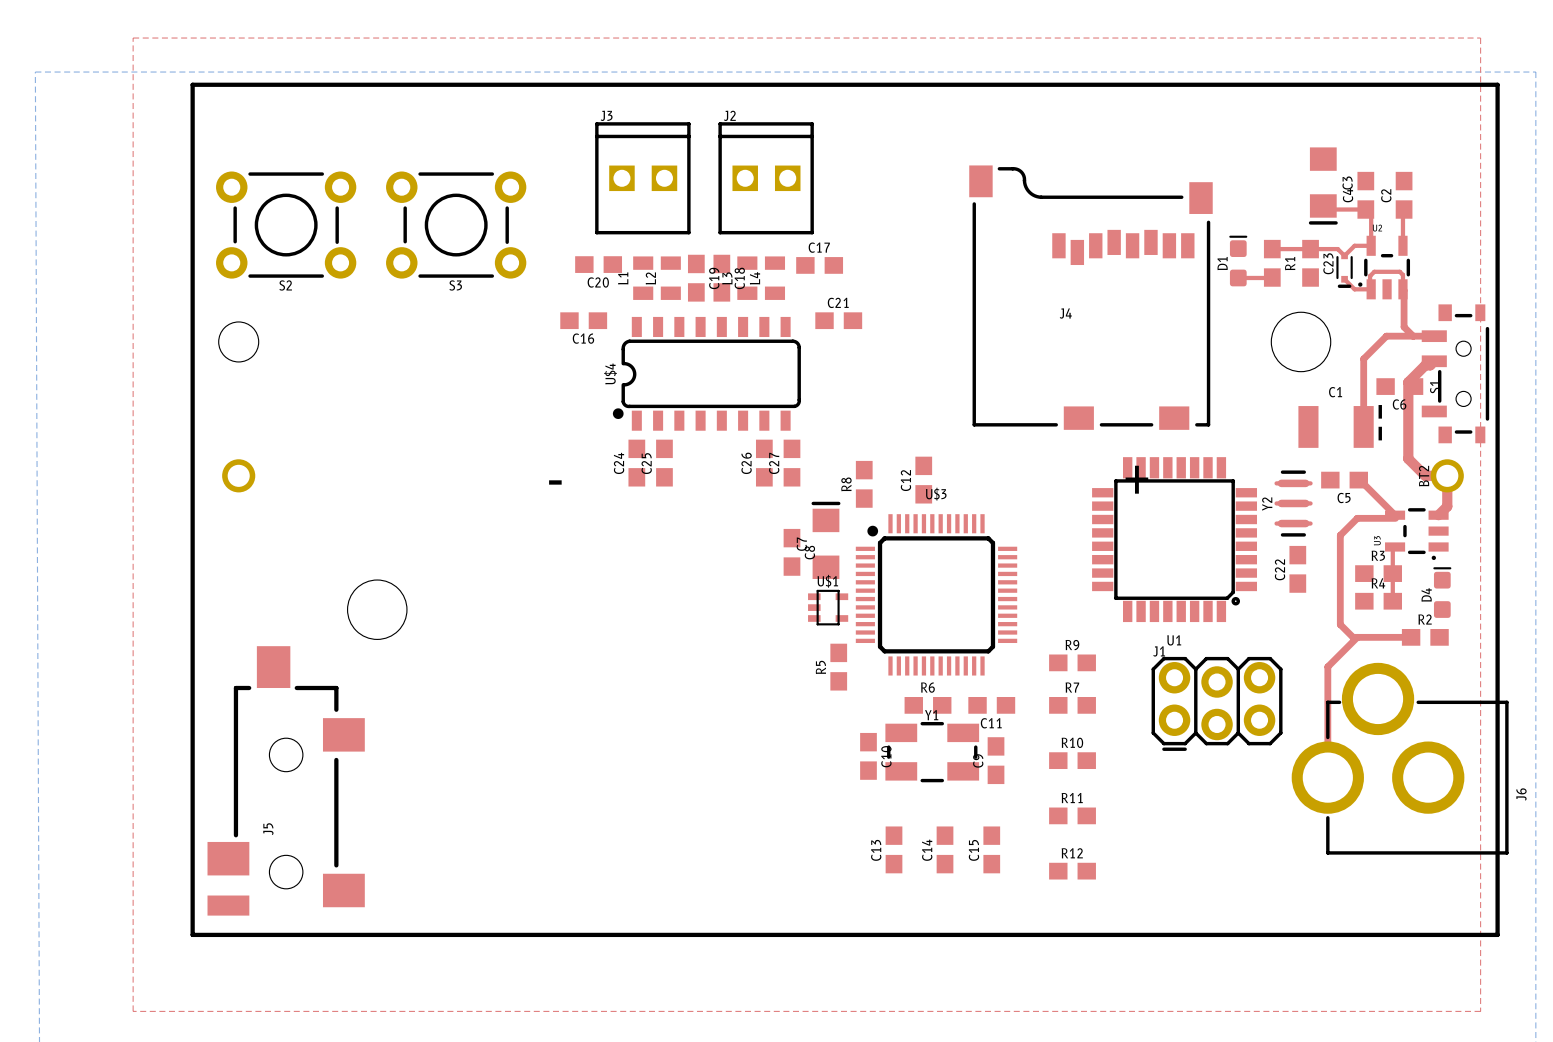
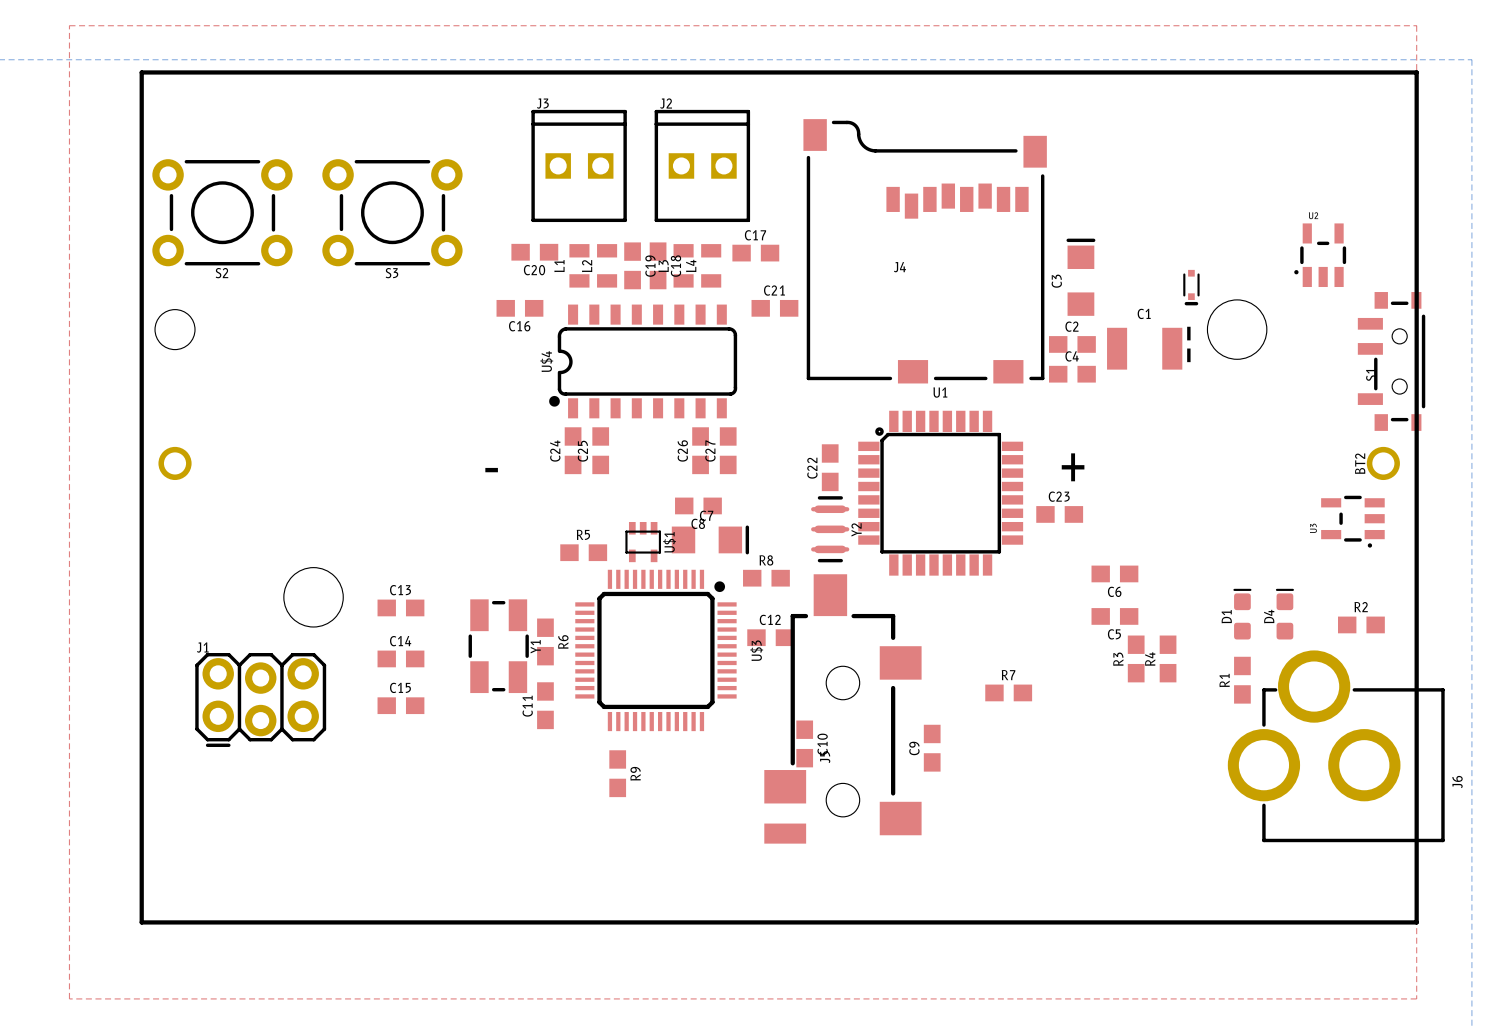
board edge: (205, 84) (192, 84) (192, 934) (205, 934) -> (141, 72) (141, 922)
board edge: (1480, 84) (1497, 84) (1497, 934) (1480, 934) -> (1416, 72) (1416, 922)
C3 rotation: 0° (1323, 186) -> 180° (1080, 277)
C3 position: (1323, 186) -> (1080, 277)
C4 rotation: 0° (1365, 195) -> 90° clockwise (1072, 374)
C4 position: (1365, 195) -> (1072, 374)
C2 rotation: 0° (1404, 195) -> 90° clockwise (1072, 344)
C2 position: (1404, 195) -> (1072, 344)
top track: (1323, 205) (1326, 209) (1365, 209) (1371, 214) (1371, 245) (1354, 245) (1344, 255) (1337, 249) (1272, 249) -> none
top track: (1404, 209) (1402, 245) -> none
D1 position: (1238, 261) -> (1242, 614)
R1 position: (1272, 263) -> (1242, 680)
R1 name position: R1 (1290, 263) -> R1 (1224, 680)
C23 rotation: 0° (1310, 263) -> 90° clockwise (1059, 514)
C23 position: (1310, 263) -> (1059, 514)
part position: (1344, 270) -> (1191, 287)
top track: (1272, 277) (1238, 277) -> none
top track: (1344, 279) (1354, 289) (1371, 289) (1370, 276) (1374, 271) (1399, 271) (1402, 274) (1404, 327) (1413, 336) -> none
J4 position: (1090, 297) -> (925, 251)
top track: (1434, 336) (1386, 336) (1363, 358) (1363, 426) -> none
top track: (1434, 361) (1430, 365) (1425, 365) (1408, 382) (1408, 458) (1425, 475) (1447, 475) (1447, 506) (1438, 515) -> none
C6 position: (1399, 386) -> (1114, 573)
C1 position: (1340, 426) -> (1148, 348)
C12 rotation: 0° (923, 480) -> 90° clockwise (770, 637)
C12 position: (923, 480) -> (770, 637)
C5 position: (1344, 480) -> (1114, 616)
top track: (1363, 483) (1395, 515) (1395, 518) (1357, 518) (1340, 535) (1340, 624) (1353, 637) (1411, 637) -> none
R8 rotation: 0° (864, 484) -> 90° clockwise (766, 578)
R8 position: (864, 484) -> (766, 578)
Y2 position: (1293, 503) -> (830, 529)
Y2 name position: Y2 (1267, 504) -> Y2 (856, 529)
U1 rotation: 0° (1174, 539) -> 180° (940, 493)
U1 position: (1174, 539) -> (940, 493)
C7 rotation: 0° (825, 540) -> 90° clockwise (710, 539)
C7 position: (825, 540) -> (710, 539)
top track: (1395, 546) (1392, 549) (1392, 601) -> none
C8 rotation: 0° (791, 552) -> 90° clockwise (698, 505)
C8 position: (791, 552) -> (698, 505)
C22 position: (1297, 569) -> (830, 467)
R3 rotation: 0° (1378, 573) -> 90° clockwise (1136, 658)
R3 position: (1378, 573) -> (1136, 658)
D4 position: (1442, 592) -> (1284, 614)
U$3 rotation: 0° (936, 594) -> 90° clockwise (655, 650)
U$3 position: (936, 594) -> (655, 650)
R4 rotation: 0° (1378, 601) -> 90° clockwise (1168, 658)
R4 position: (1378, 601) -> (1168, 658)
U$1 rotation: 0° (828, 607) -> 90° clockwise (643, 542)
U$1 position: (828, 607) -> (643, 542)
top track: (1357, 637) (1327, 666) (1327, 777) -> none
R9 rotation: 0° (1072, 662) -> 90° clockwise (617, 773)
R9 position: (1072, 662) -> (617, 773)
R5 rotation: 0° (838, 667) -> 90° clockwise (583, 552)
R5 position: (838, 667) -> (583, 552)
J1 position: (1217, 703) -> (260, 699)
R6 rotation: 0° (928, 705) -> 90° clockwise (545, 641)
R6 position: (928, 705) -> (545, 641)
C11 rotation: 0° (991, 705) -> 90° clockwise (545, 705)
C11 position: (991, 705) -> (545, 705)
Y1 rotation: 0° (932, 752) -> 90° clockwise (498, 646)
Y1 position: (932, 752) -> (498, 646)
R10: (1072, 760) -> none
J5 position: (286, 780) -> (842, 708)
R11: (1072, 815) -> none
C13 rotation: 0° (894, 849) -> 90° clockwise (400, 607)
C13 position: (894, 849) -> (400, 607)
C14 rotation: 0° (945, 849) -> 90° clockwise (400, 658)
C14 position: (945, 849) -> (400, 658)
C15 rotation: 0° (991, 849) -> 90° clockwise (400, 705)
C15 position: (991, 849) -> (400, 705)
R12: (1072, 871) -> none

